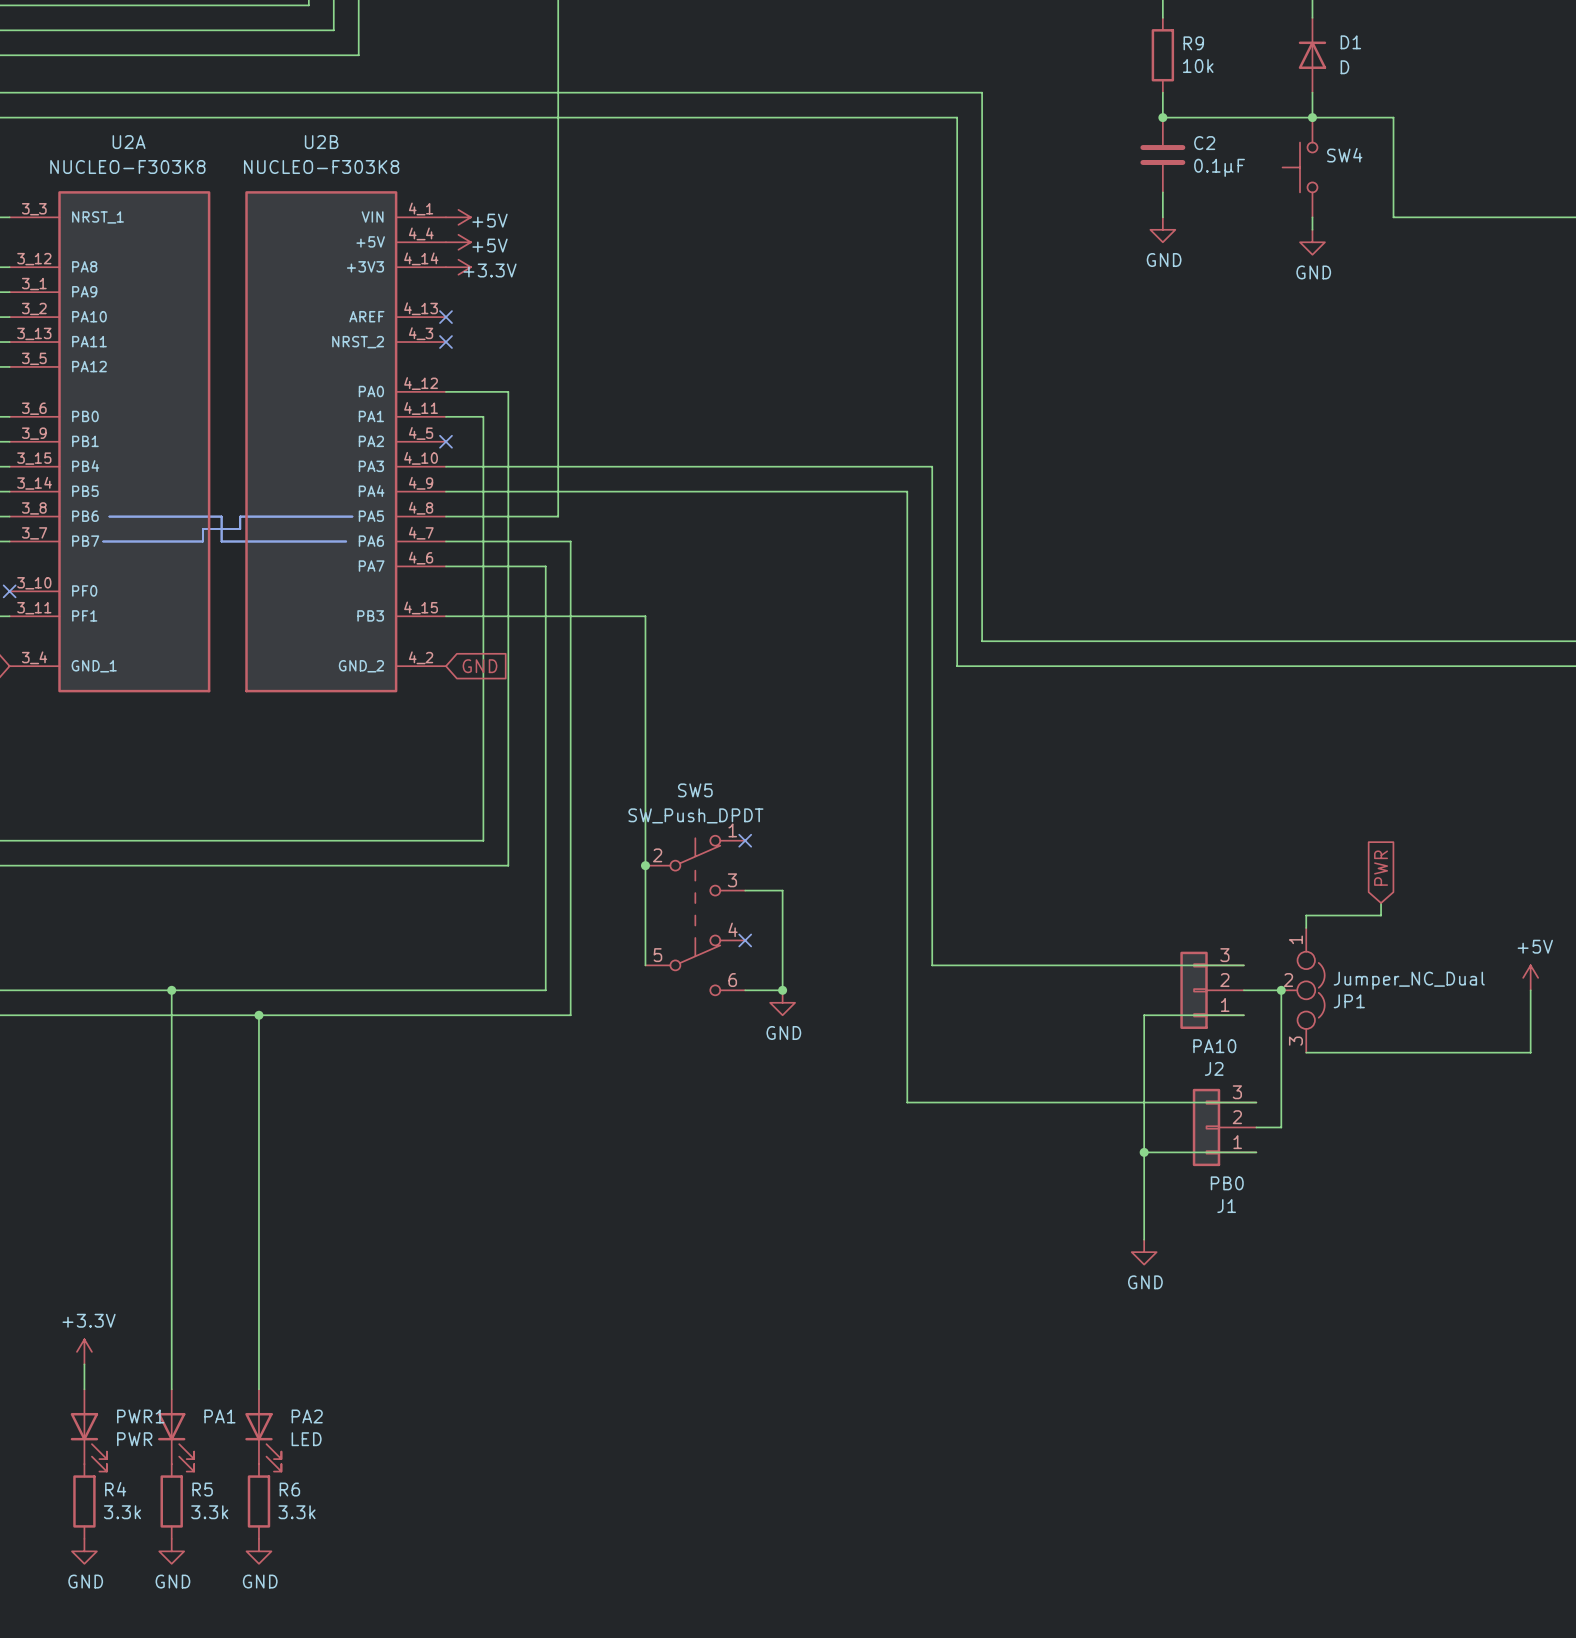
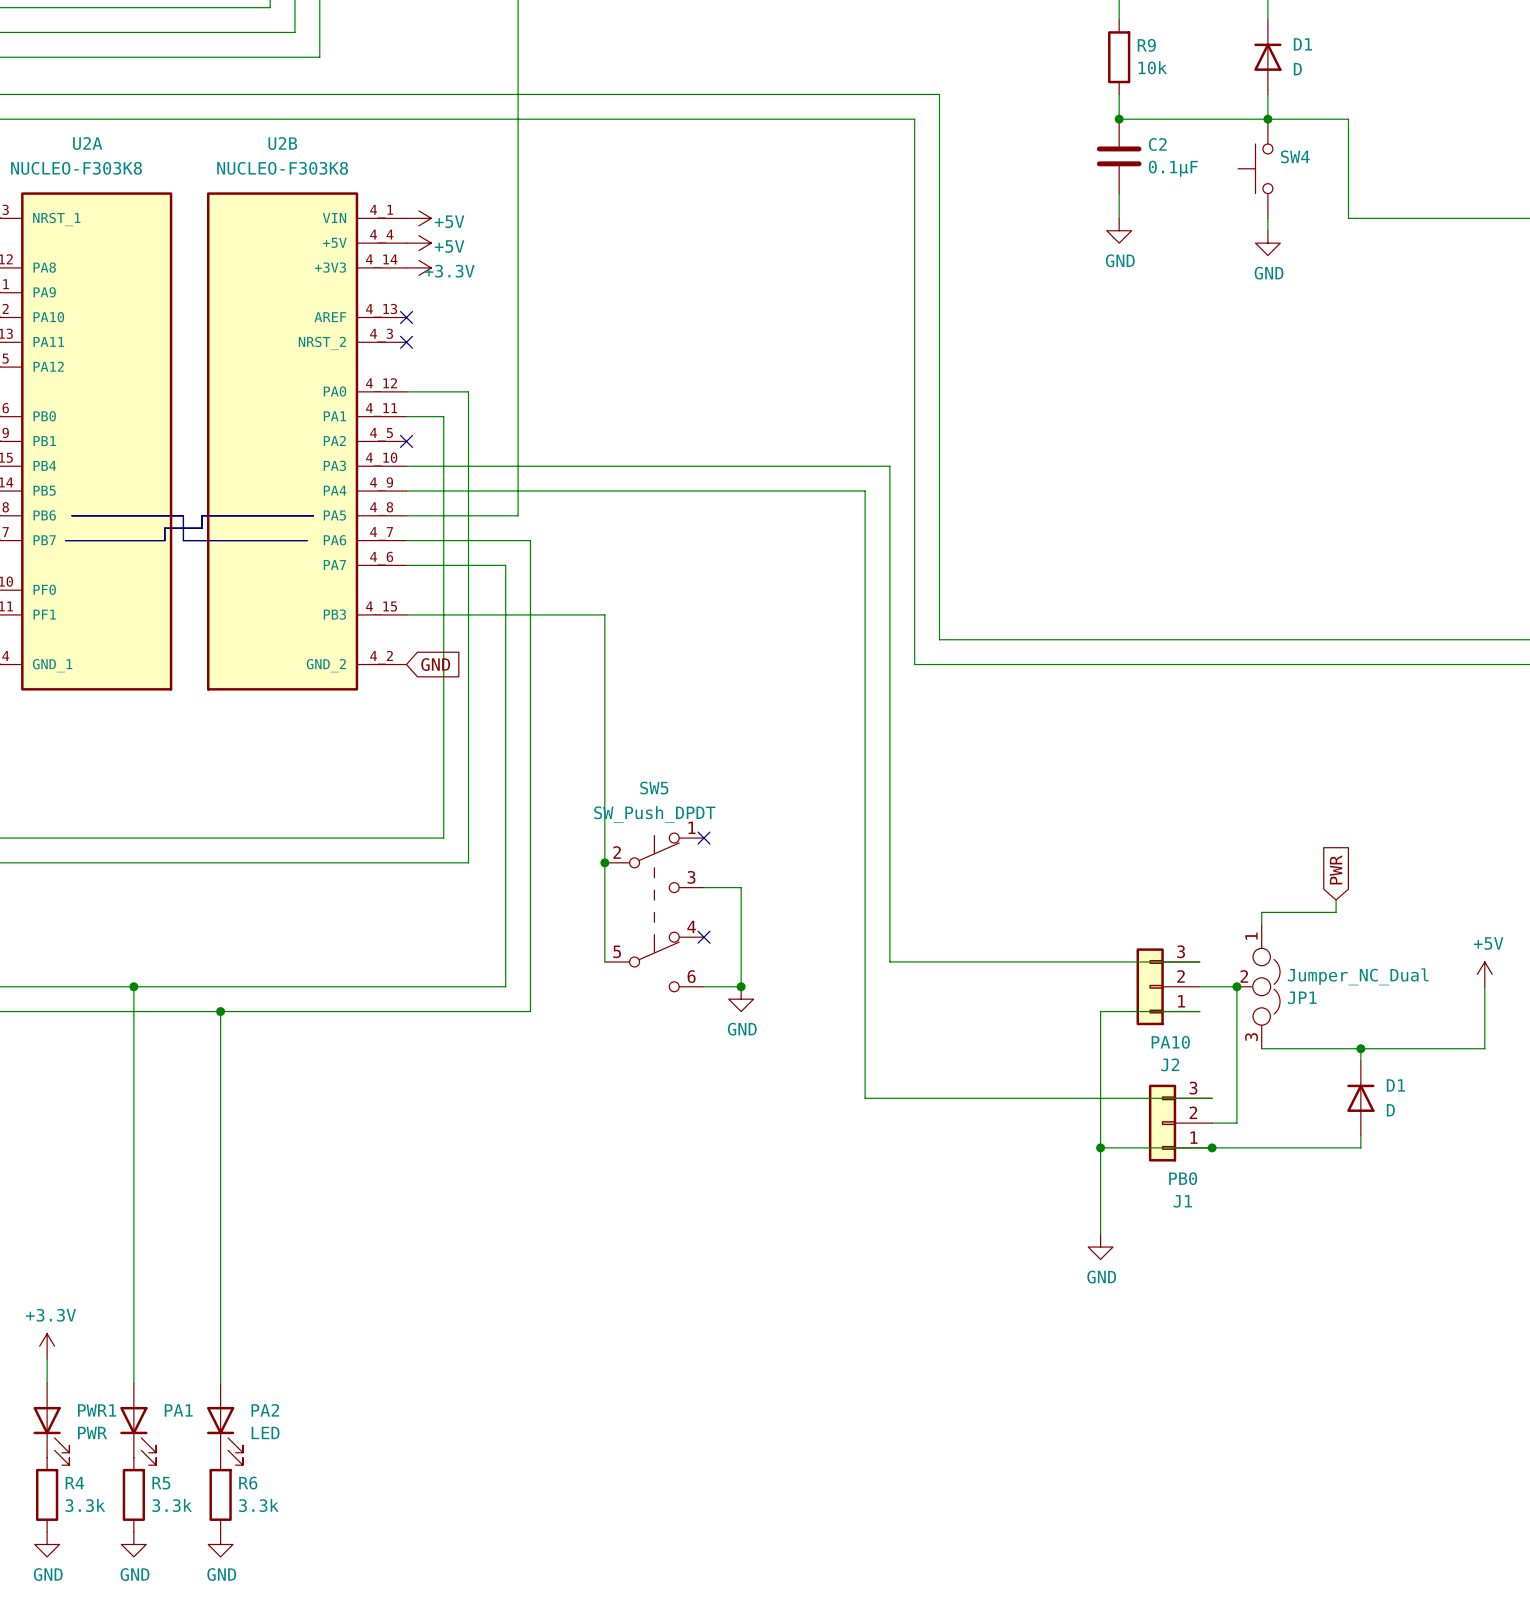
wire: none -> (1360, 1048) (1360, 1061)
junction: none -> (1360, 1048)
D1: none -> D (1360, 1098)
wire: none -> (1360, 1135) (1360, 1147) (1212, 1147)
junction: none -> (1212, 1147)

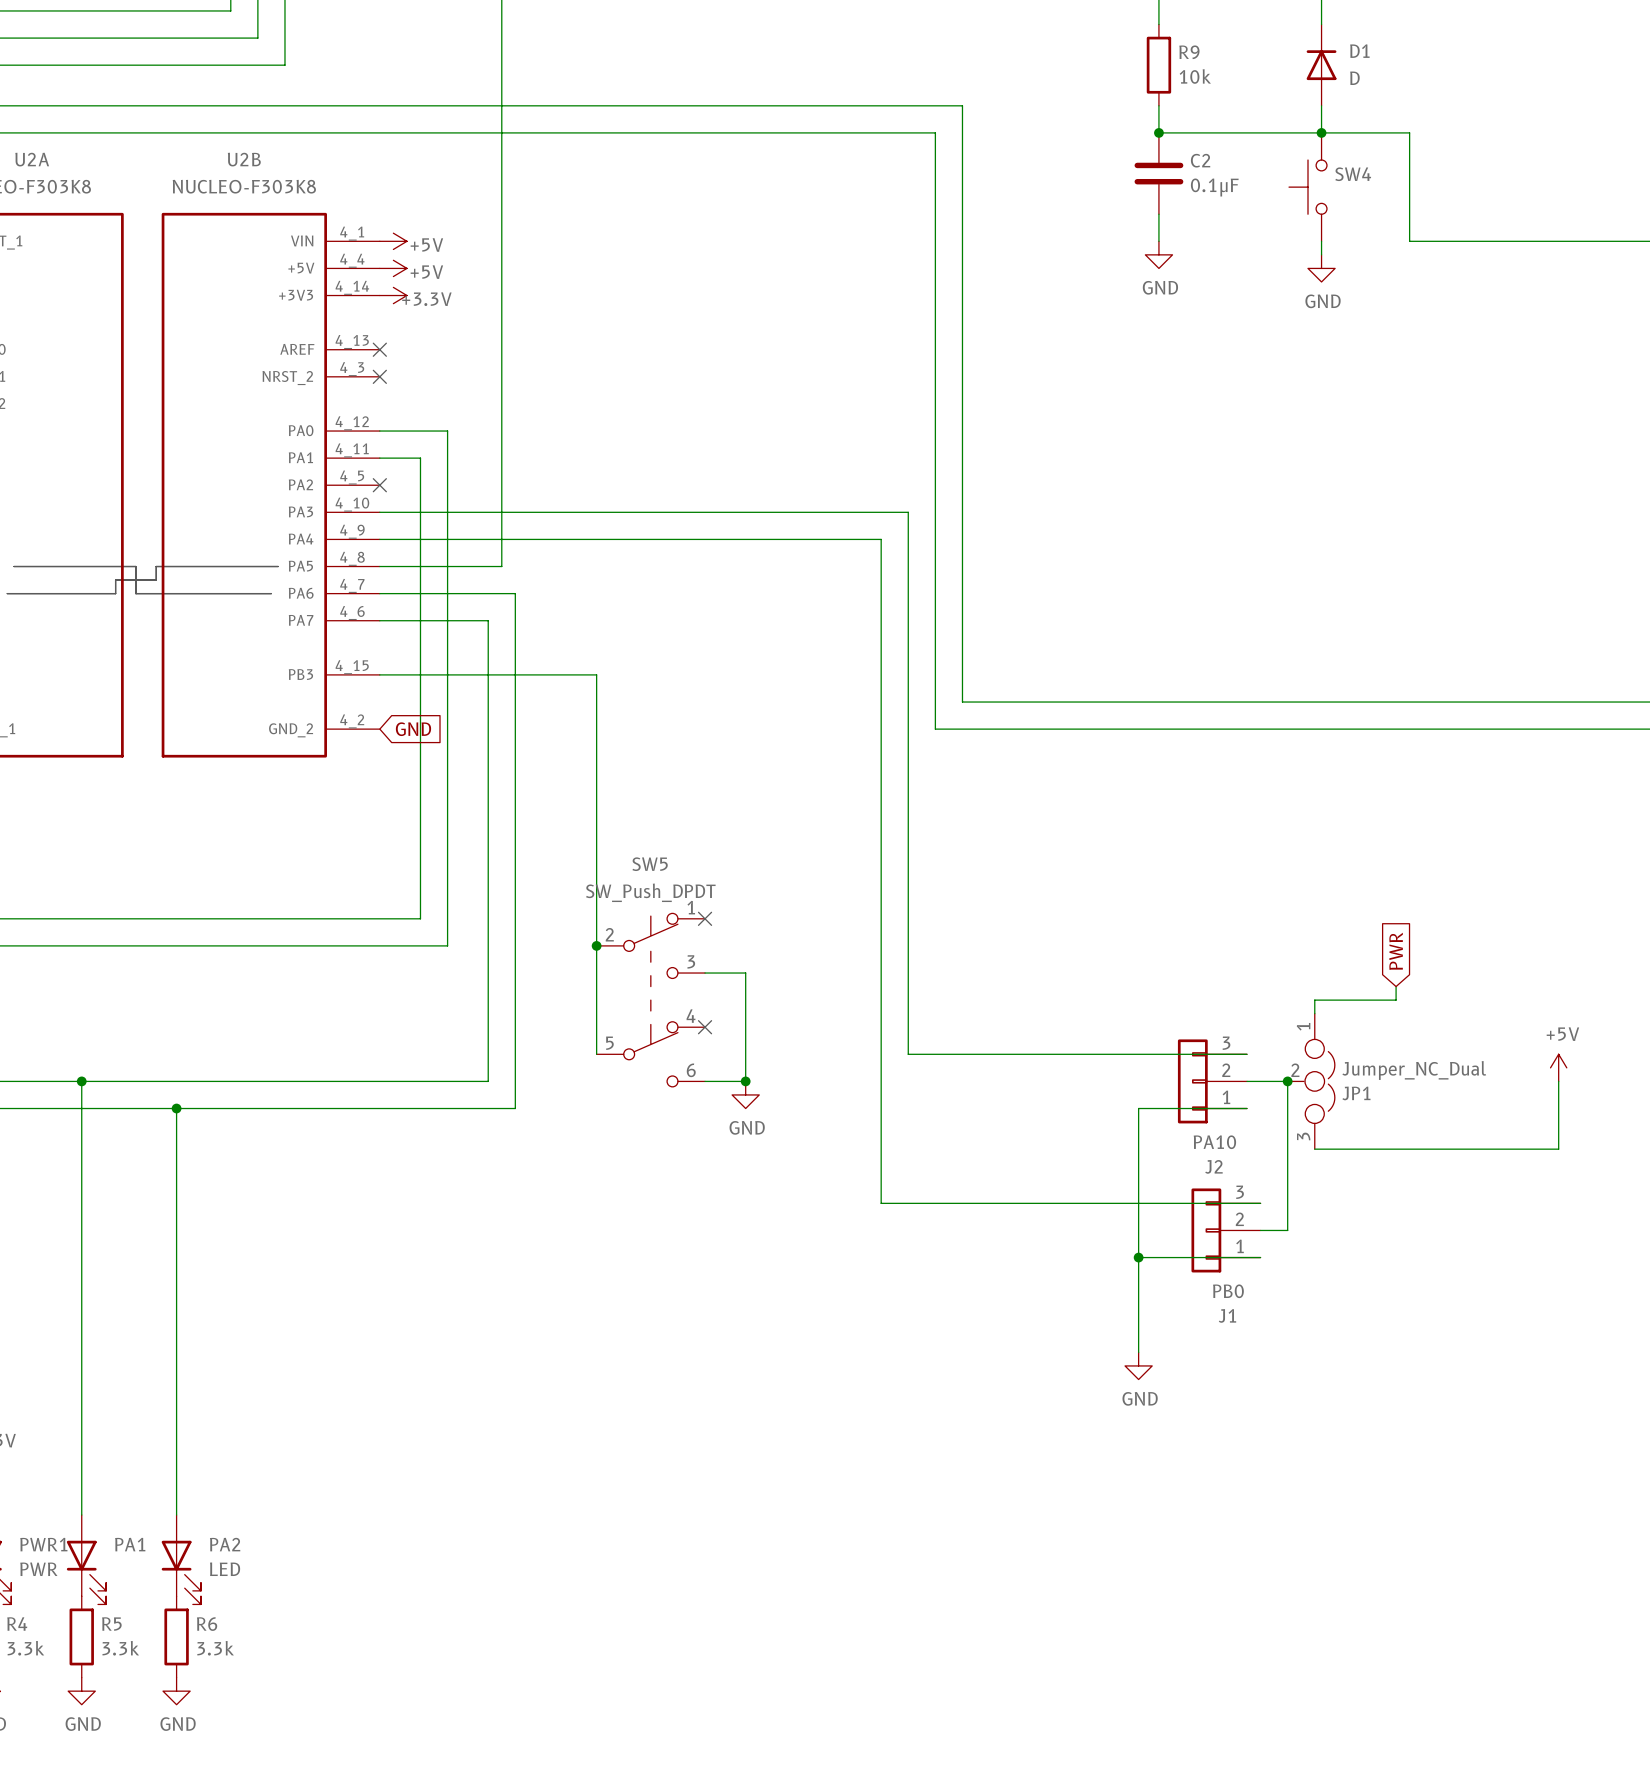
wire: (1360, 1048) (1360, 1061) -> none
junction: (1360, 1048) -> none
D1: D (1360, 1098) -> none
wire: (1360, 1135) (1360, 1147) (1212, 1147) -> none
junction: (1212, 1147) -> none

